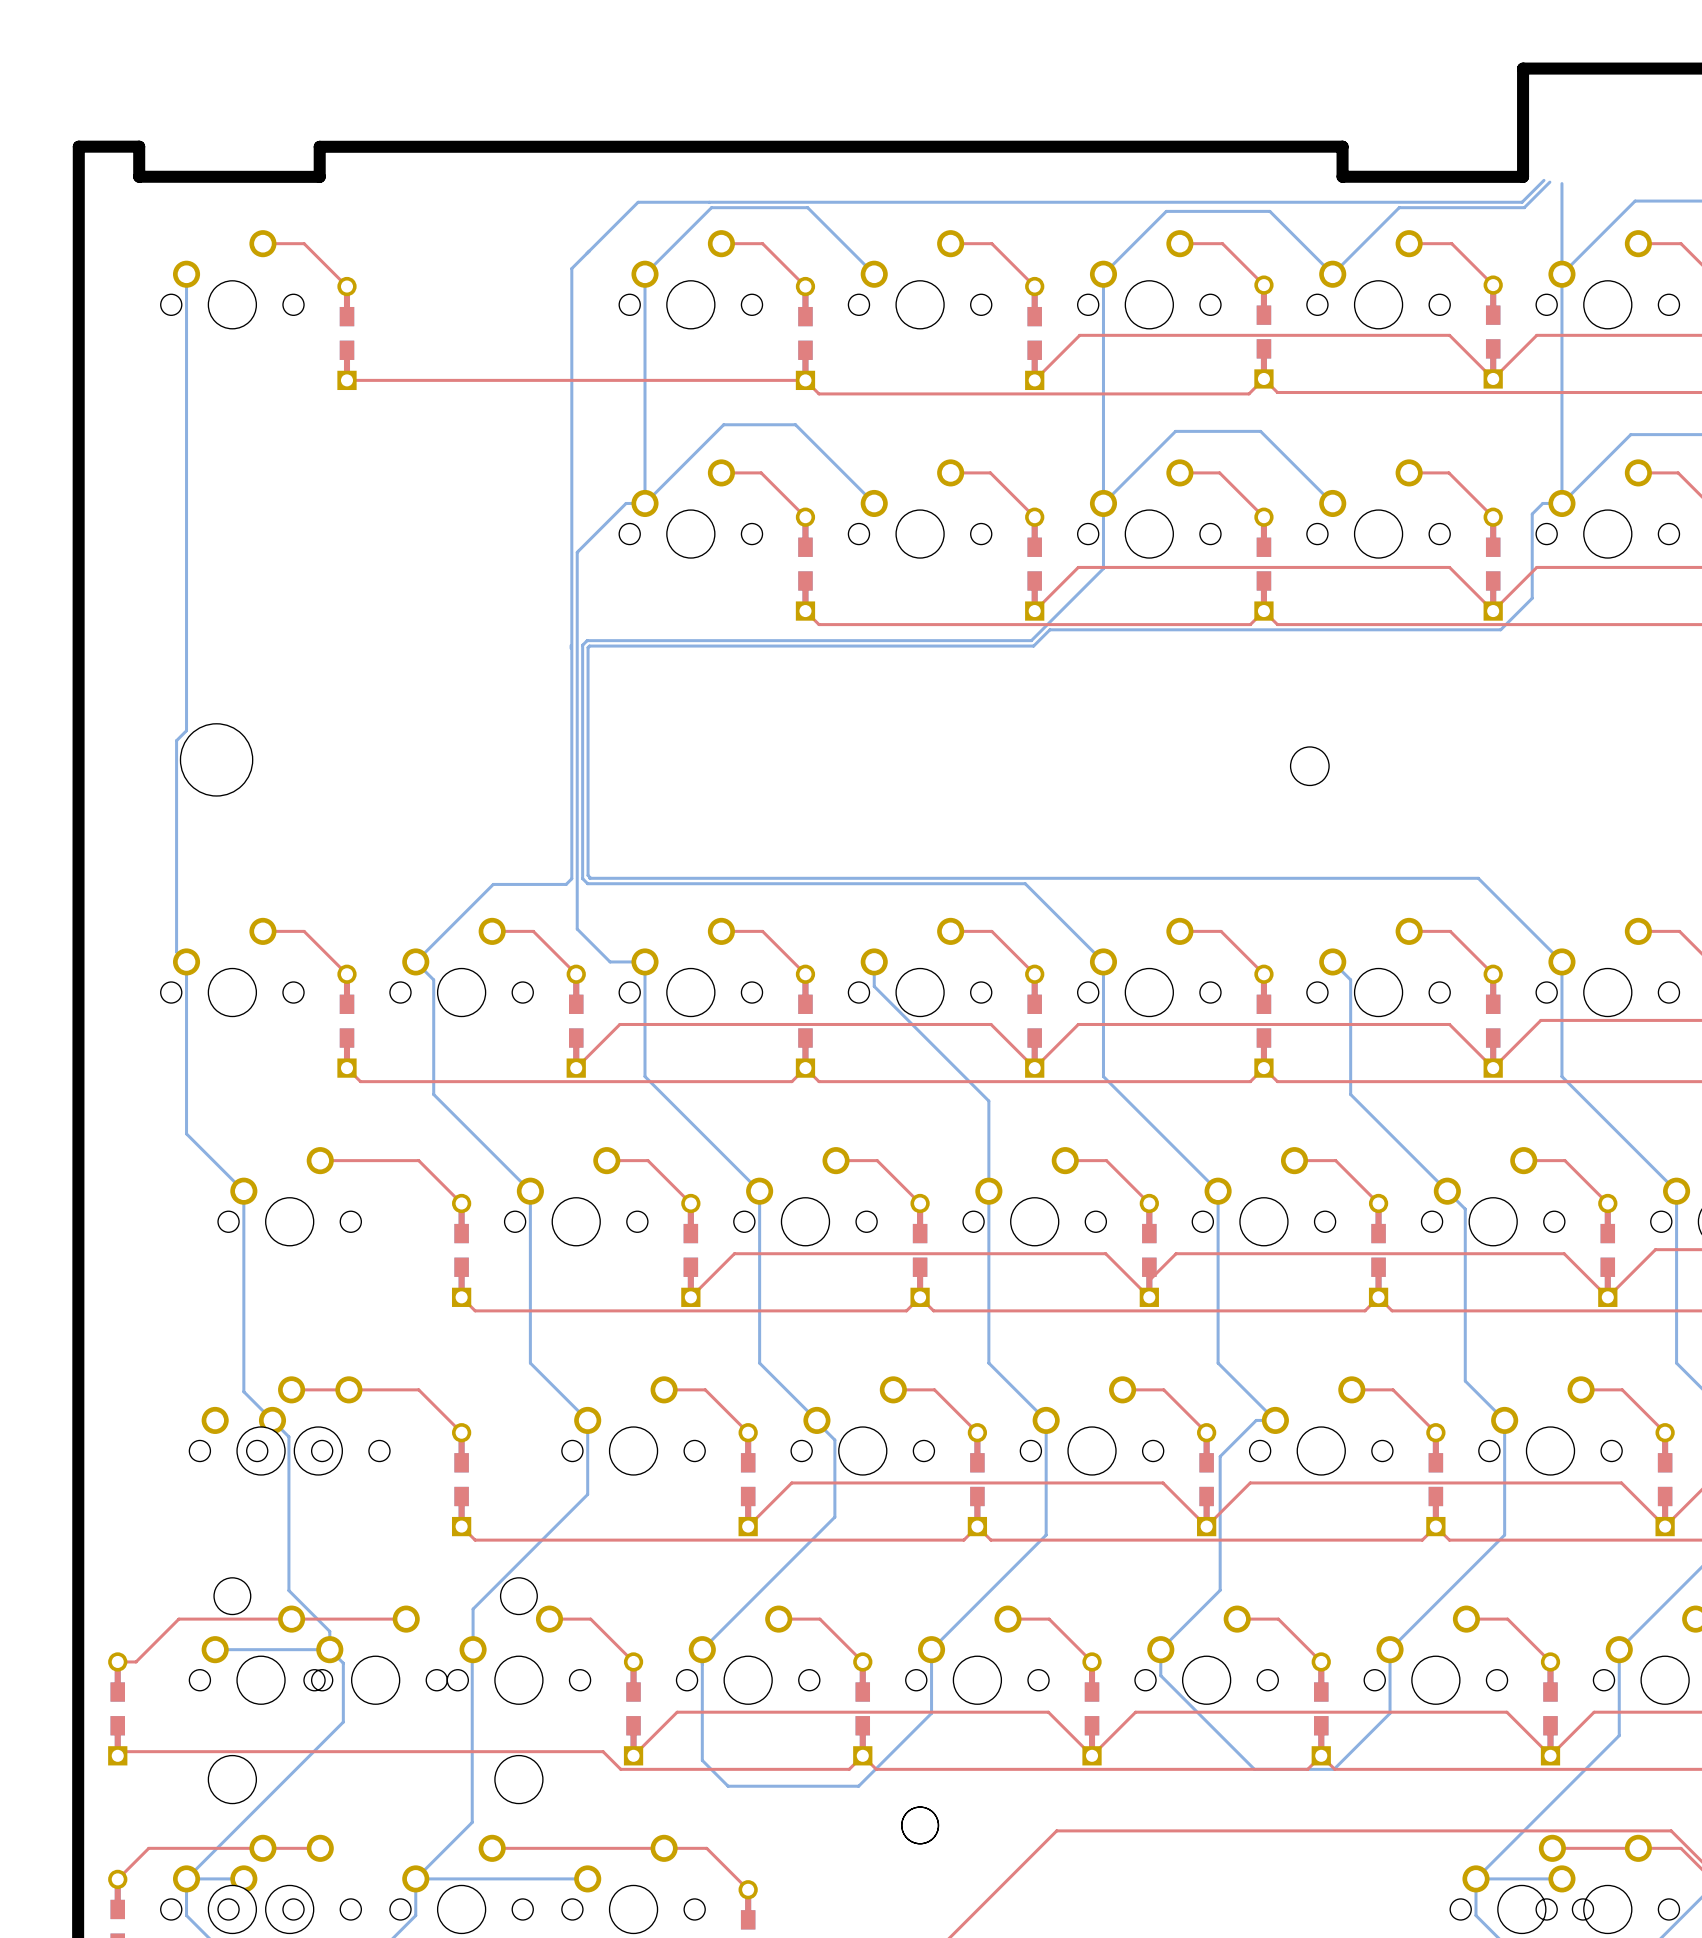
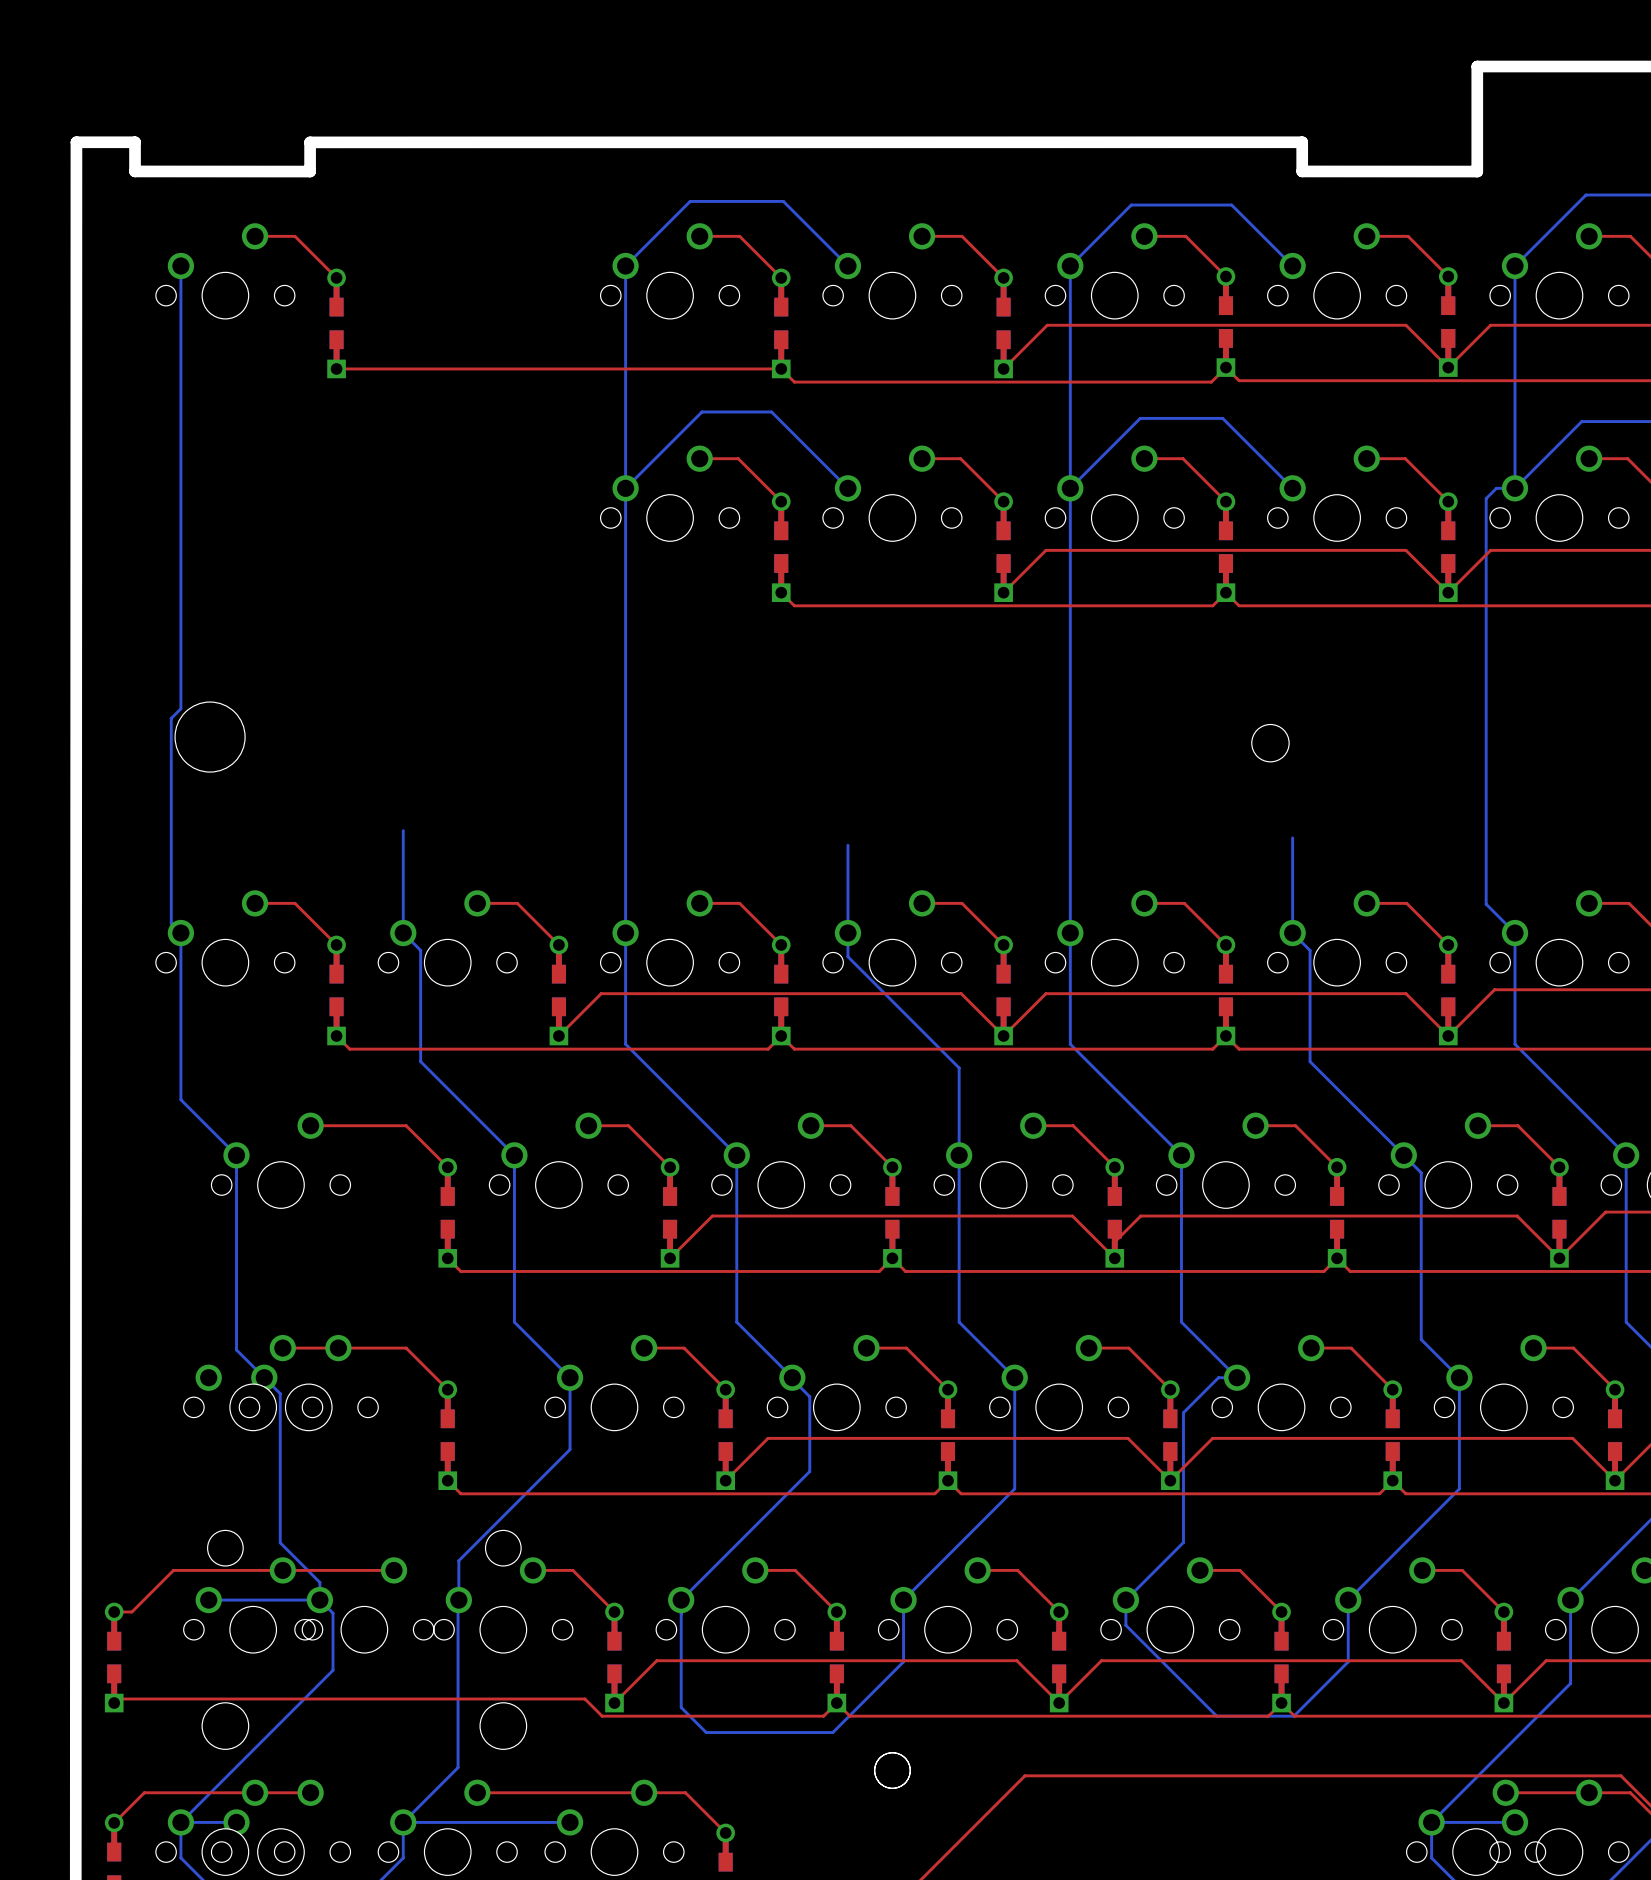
bottom track: (1544, 180) (1522, 202) (638, 202) (571, 268) (571, 878) (566, 884) (493, 884) (415, 961) -> (403, 830) (403, 933)
bottom track: (1549, 182) (1524, 207) (1399, 207) (1332, 274) -> none
bottom track: (1561, 183) (1561, 274) -> none
bottom track: (645, 503) (626, 503) (577, 552) (577, 929) (610, 961) (645, 961) -> (625, 488) (625, 933)
bottom track: (1103, 568) (1031, 640) (587, 640) (582, 645) (582, 878) (587, 883) (1025, 883) (1103, 961) -> (1070, 551) (1070, 933)
bottom track: (1532, 598) (1500, 629) (1049, 629) (1033, 646) (588, 647) (588, 875) (589, 878) (1478, 878) (1532, 932) -> (1486, 580) (1486, 904)
bottom track: none -> (1292, 837) (1292, 933)
bottom track: none -> (847, 845) (847, 933)

